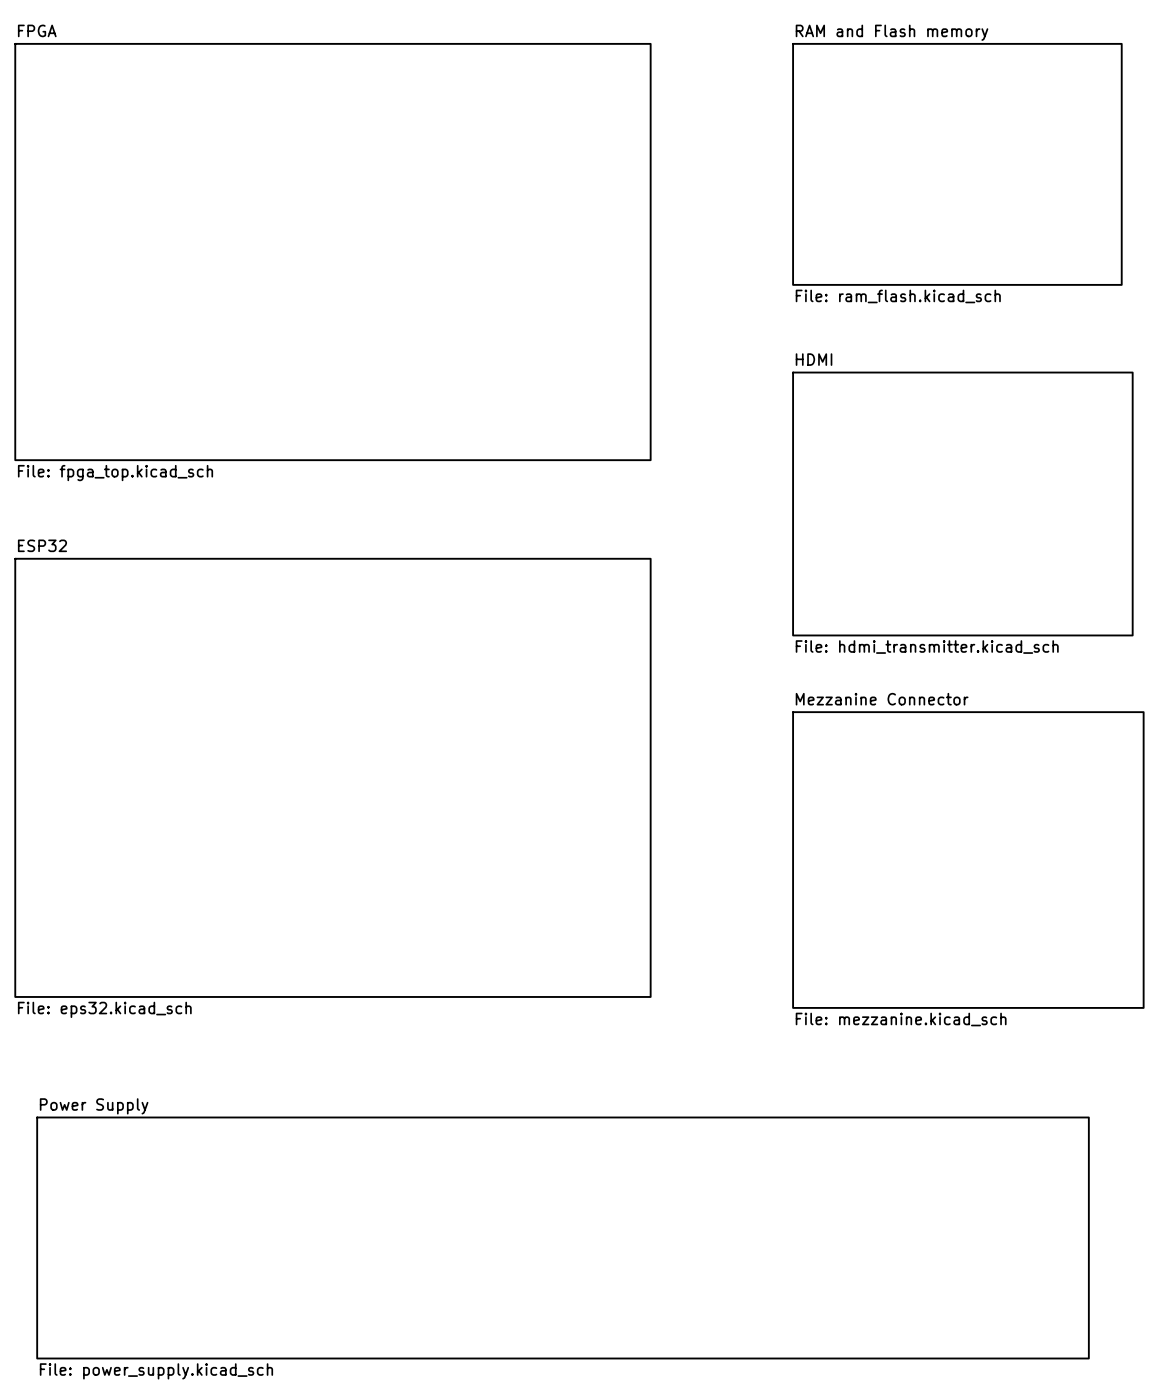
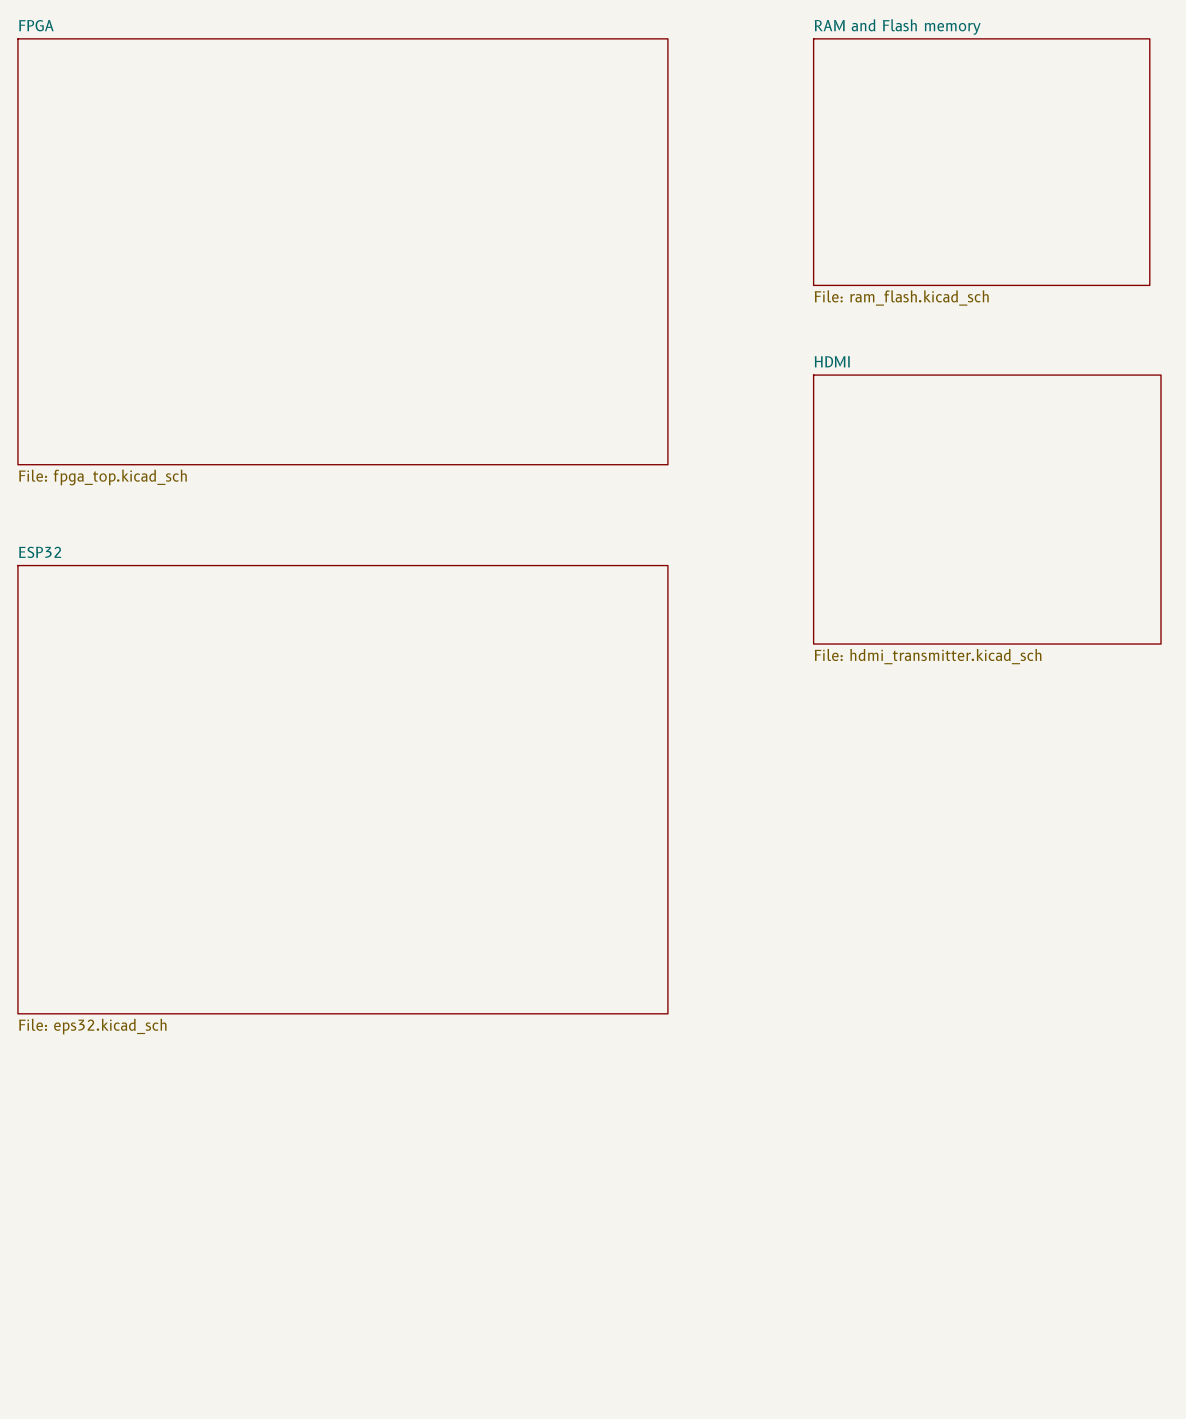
sheet Mezzanine Connector: File: mezzanine.kicad_sch (968, 860) -> none
sheet Power Supply: File: power_supply.kicad_sch (563, 1237) -> none

